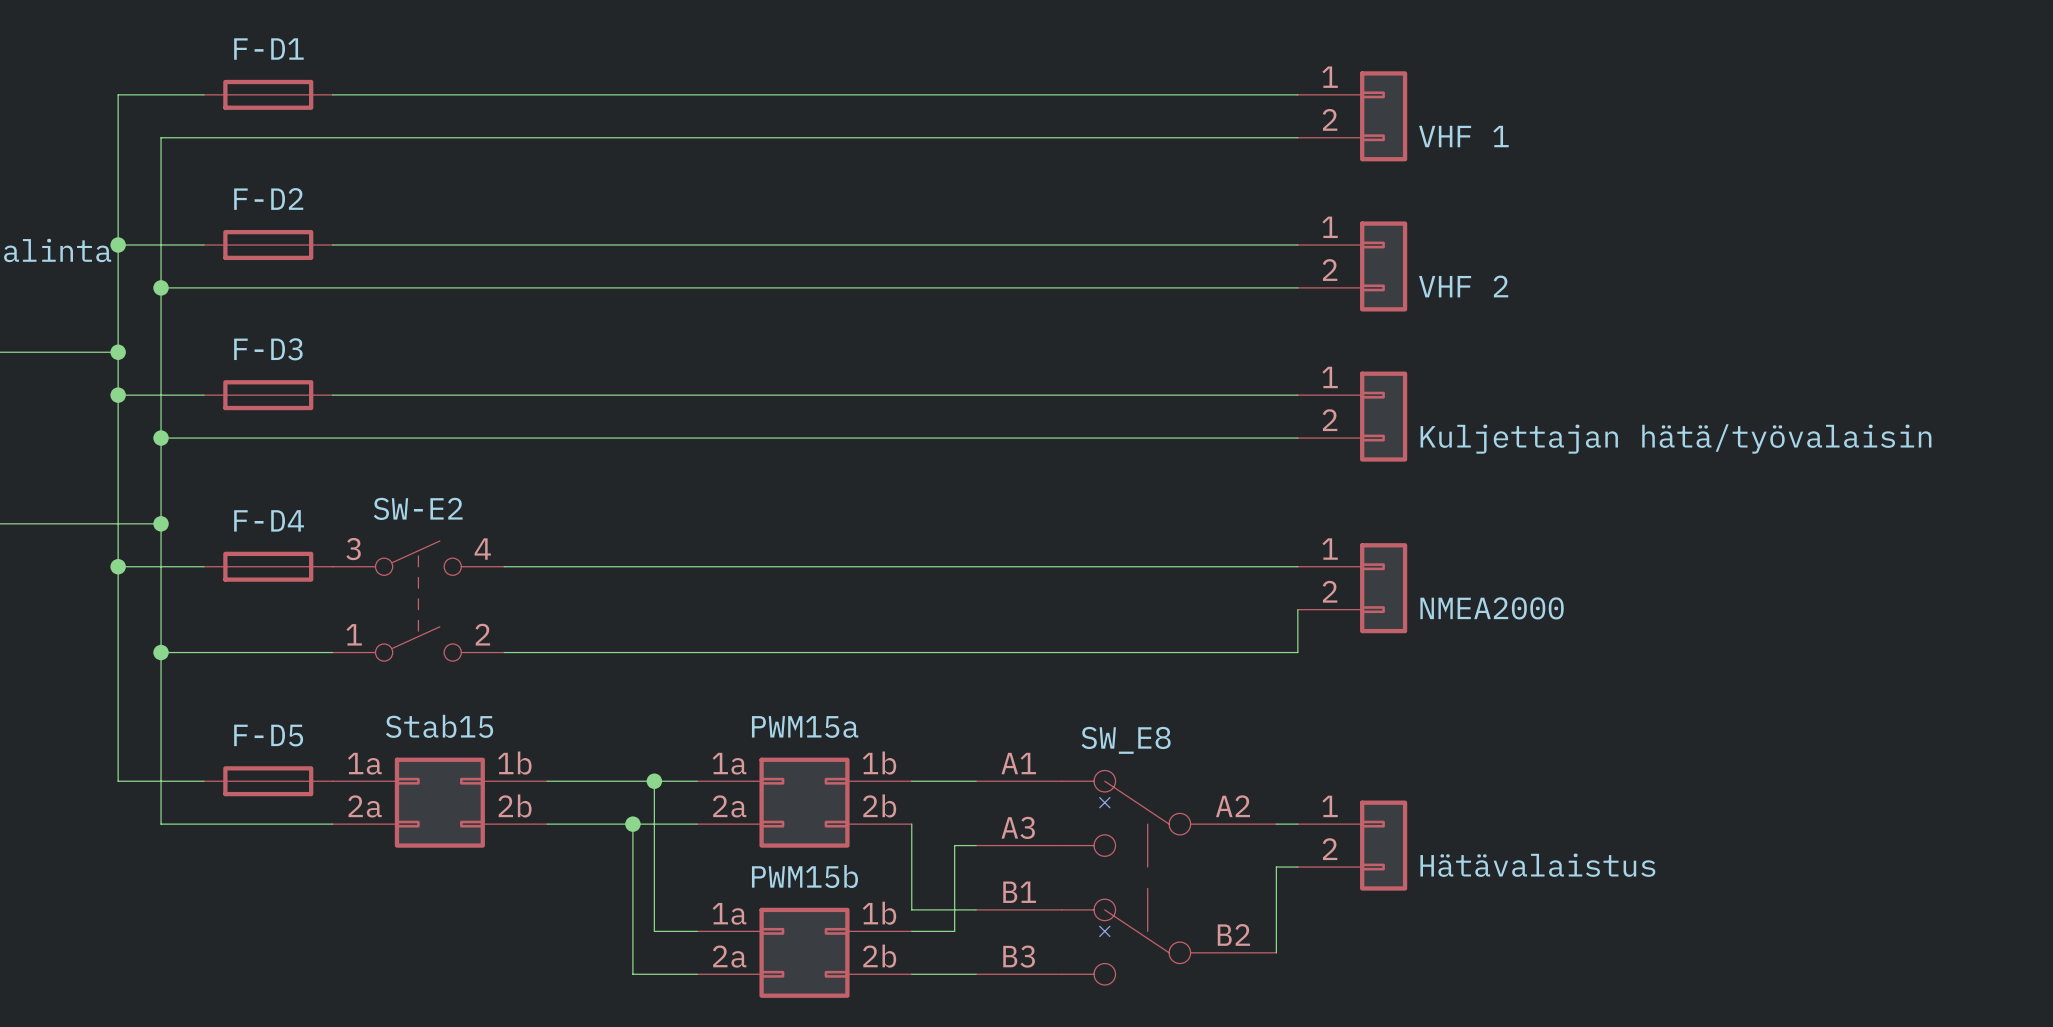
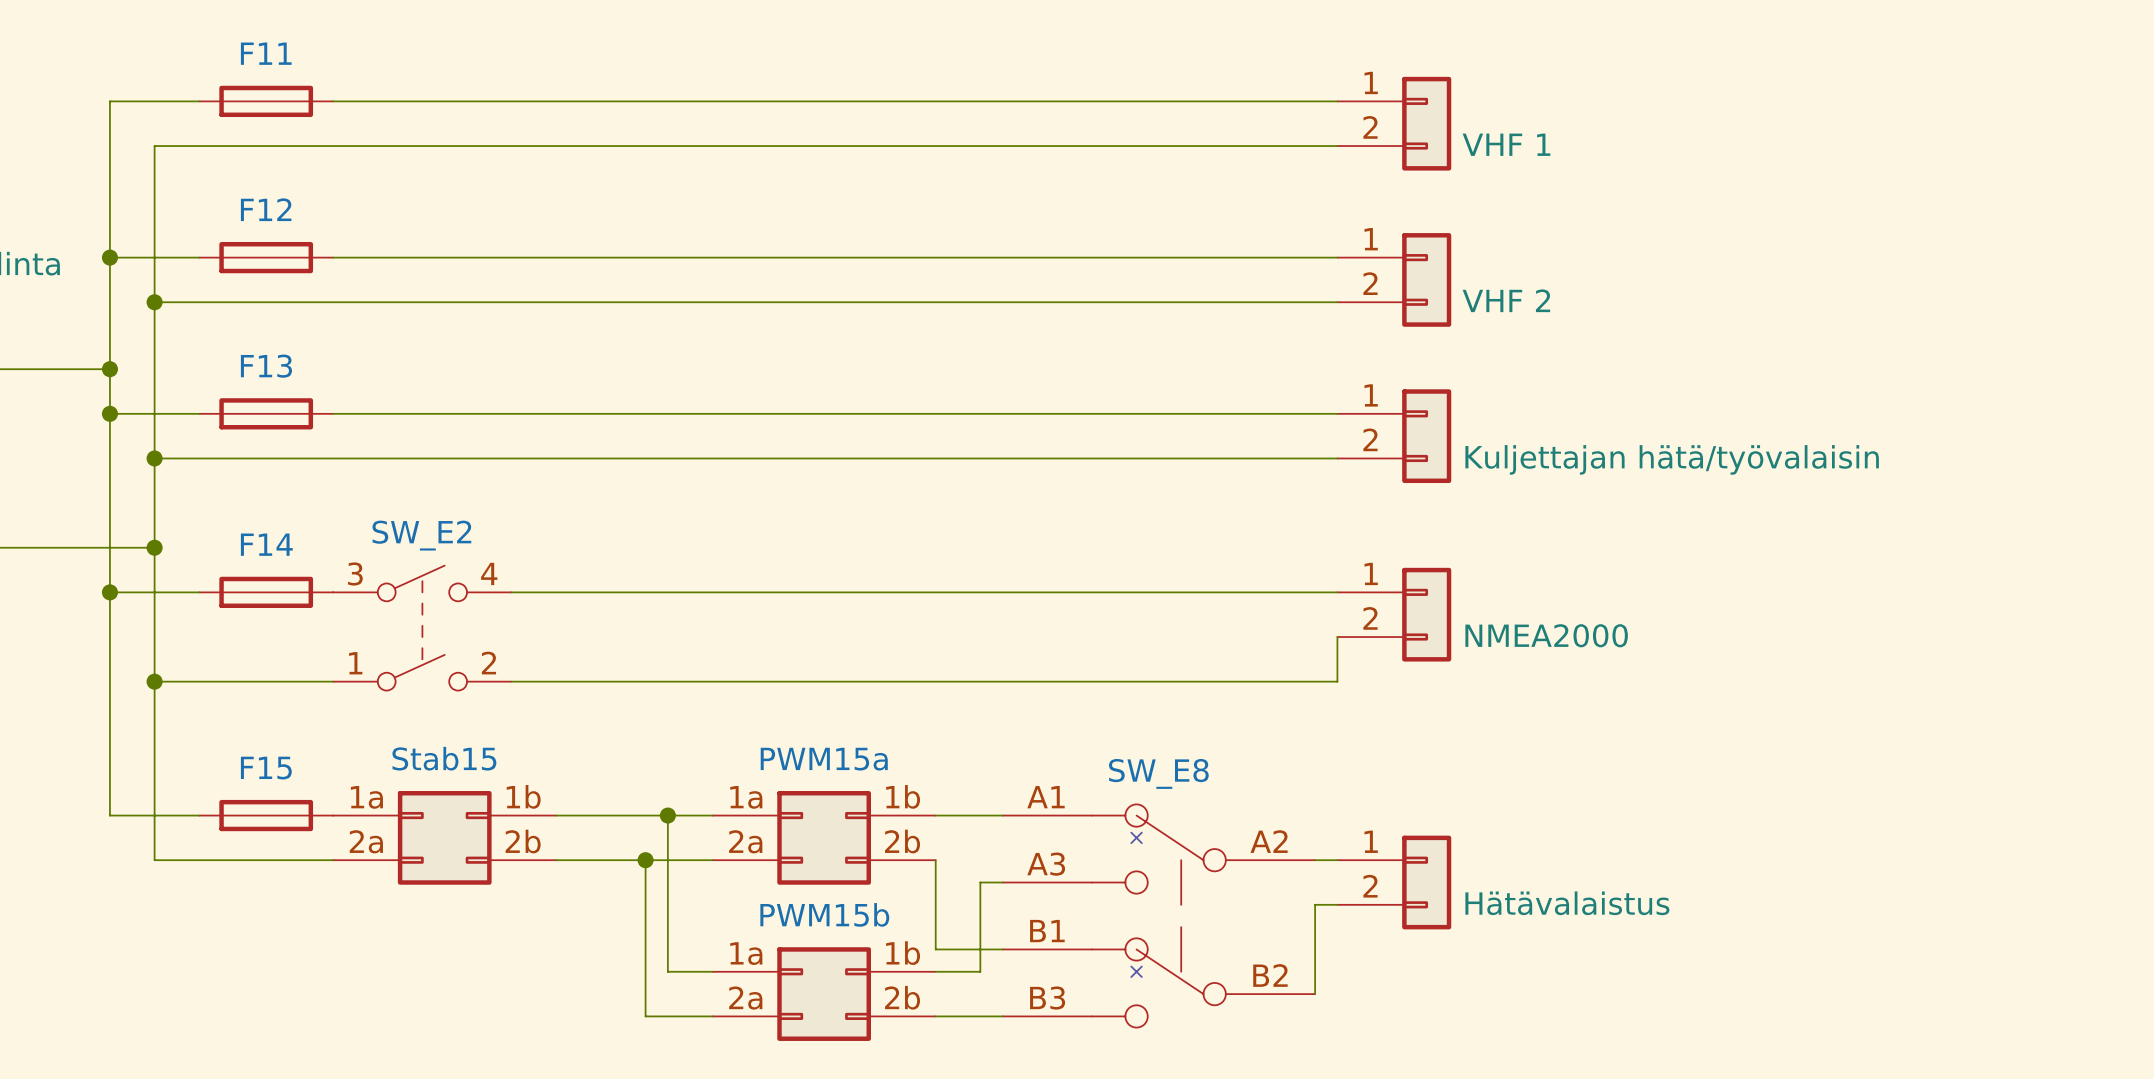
F-D1 name: F-D1 (268, 49) -> F11 (266, 53)
F-D2 name: F-D2 (268, 198) -> F12 (266, 209)
F-D3 name: F-D3 (268, 349) -> F13 (266, 366)
SW-E2 name: SW-E2 (418, 508) -> SW_E2 (421, 535)
F-D4 name: F-D4 (269, 520) -> F14 (266, 544)
F-D5 name: F-D5 (268, 735) -> F15 (266, 768)

